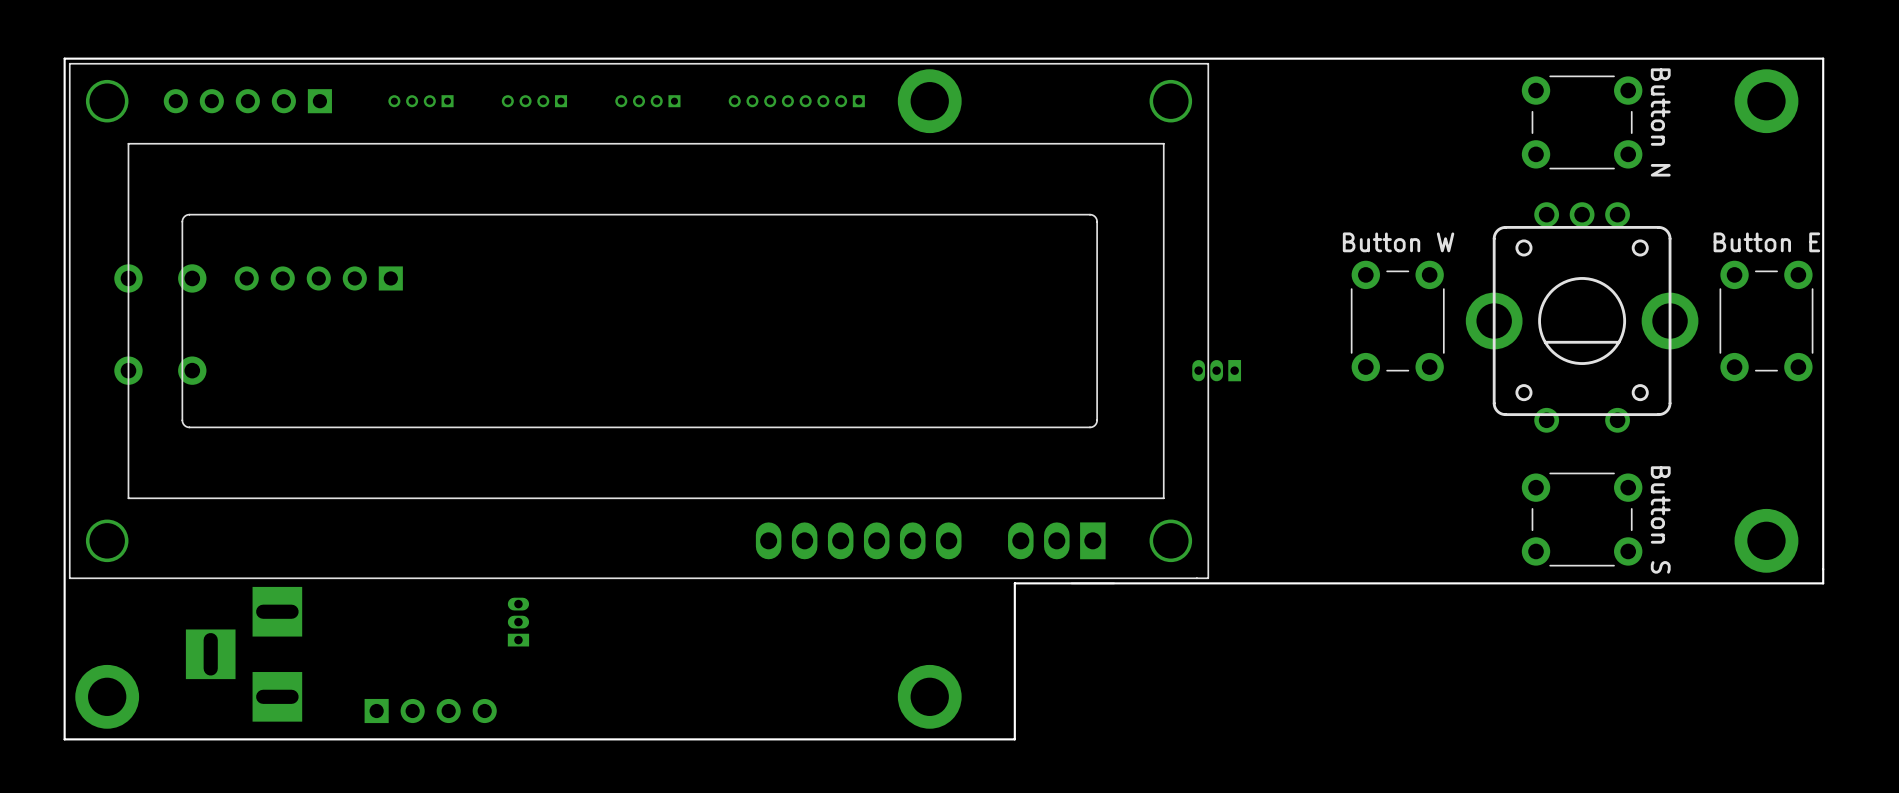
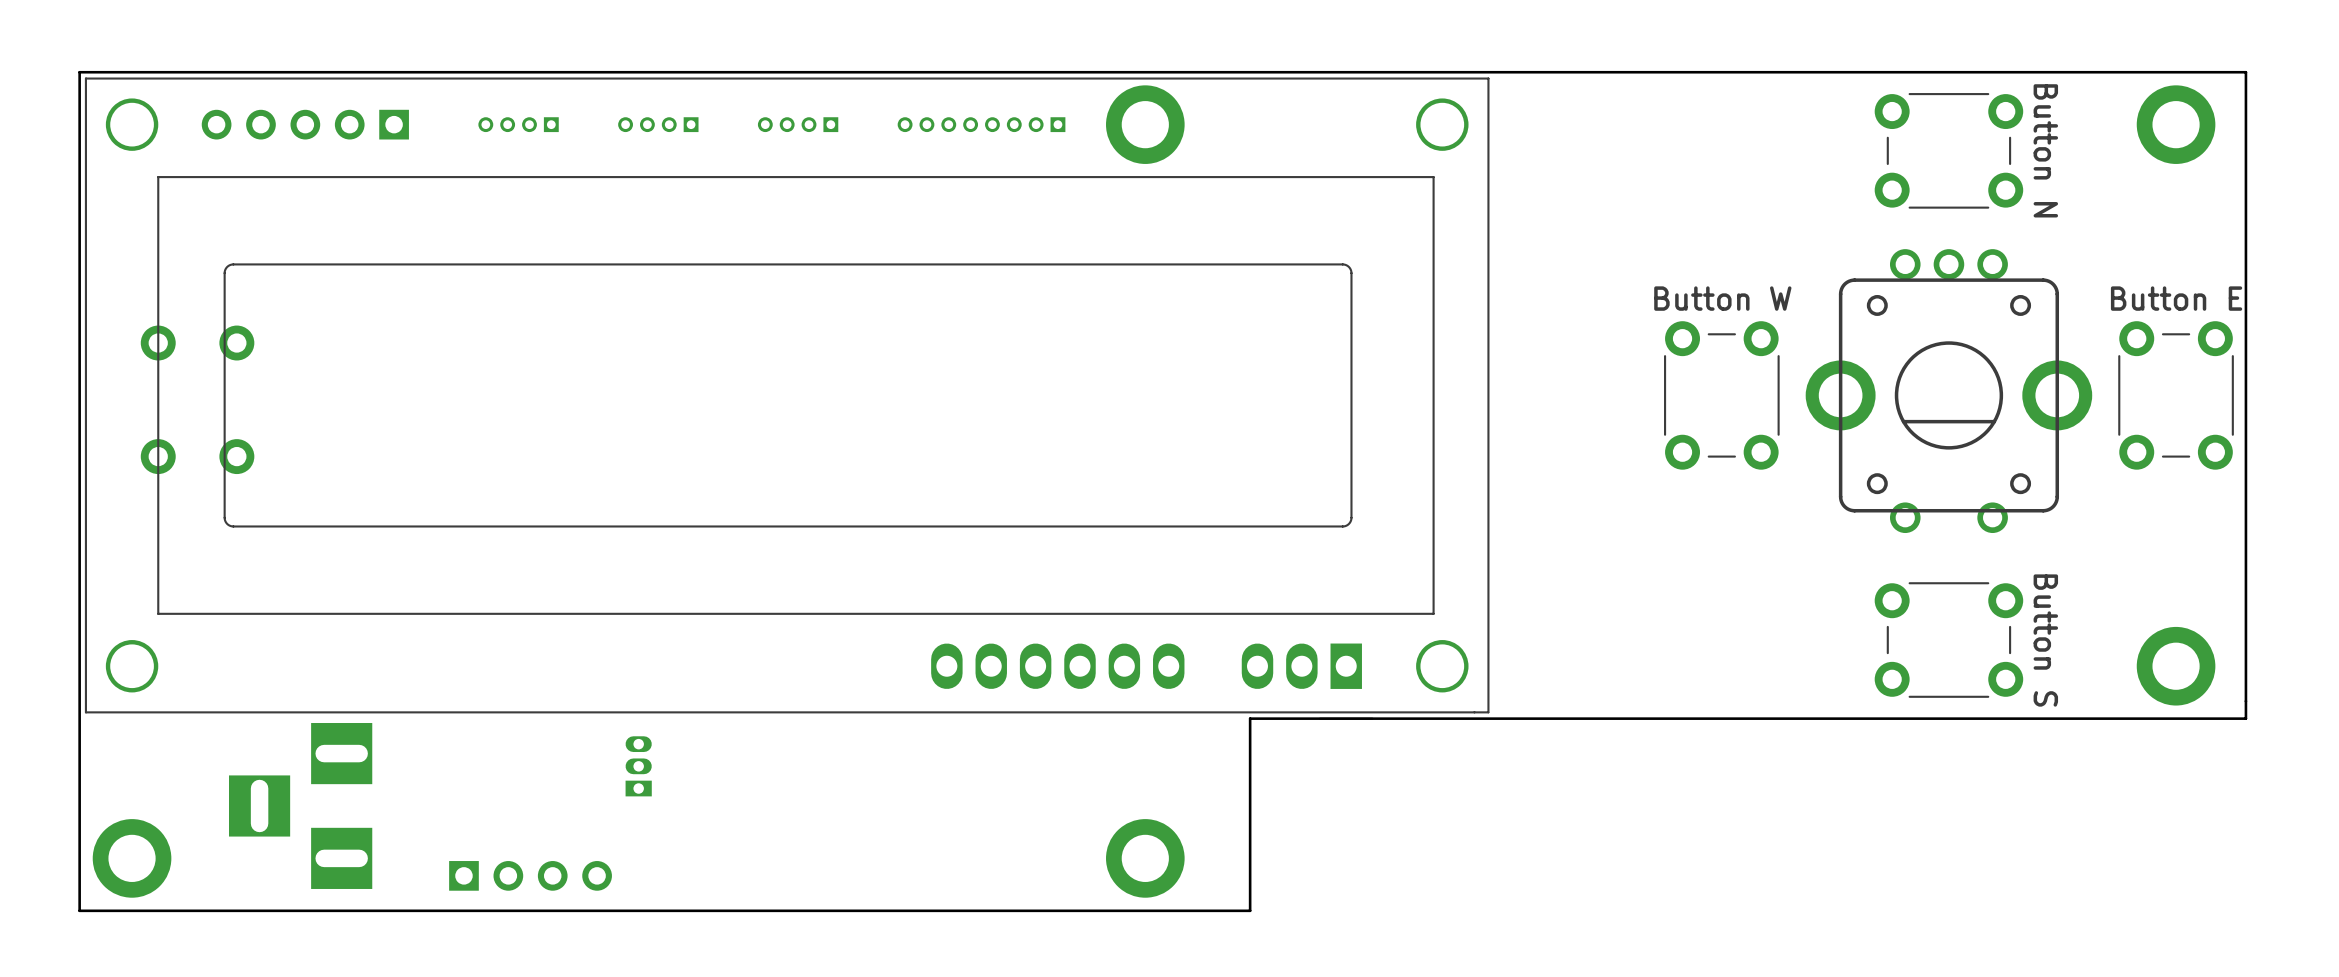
part: (318, 278) -> none
part: (1216, 370) -> none

